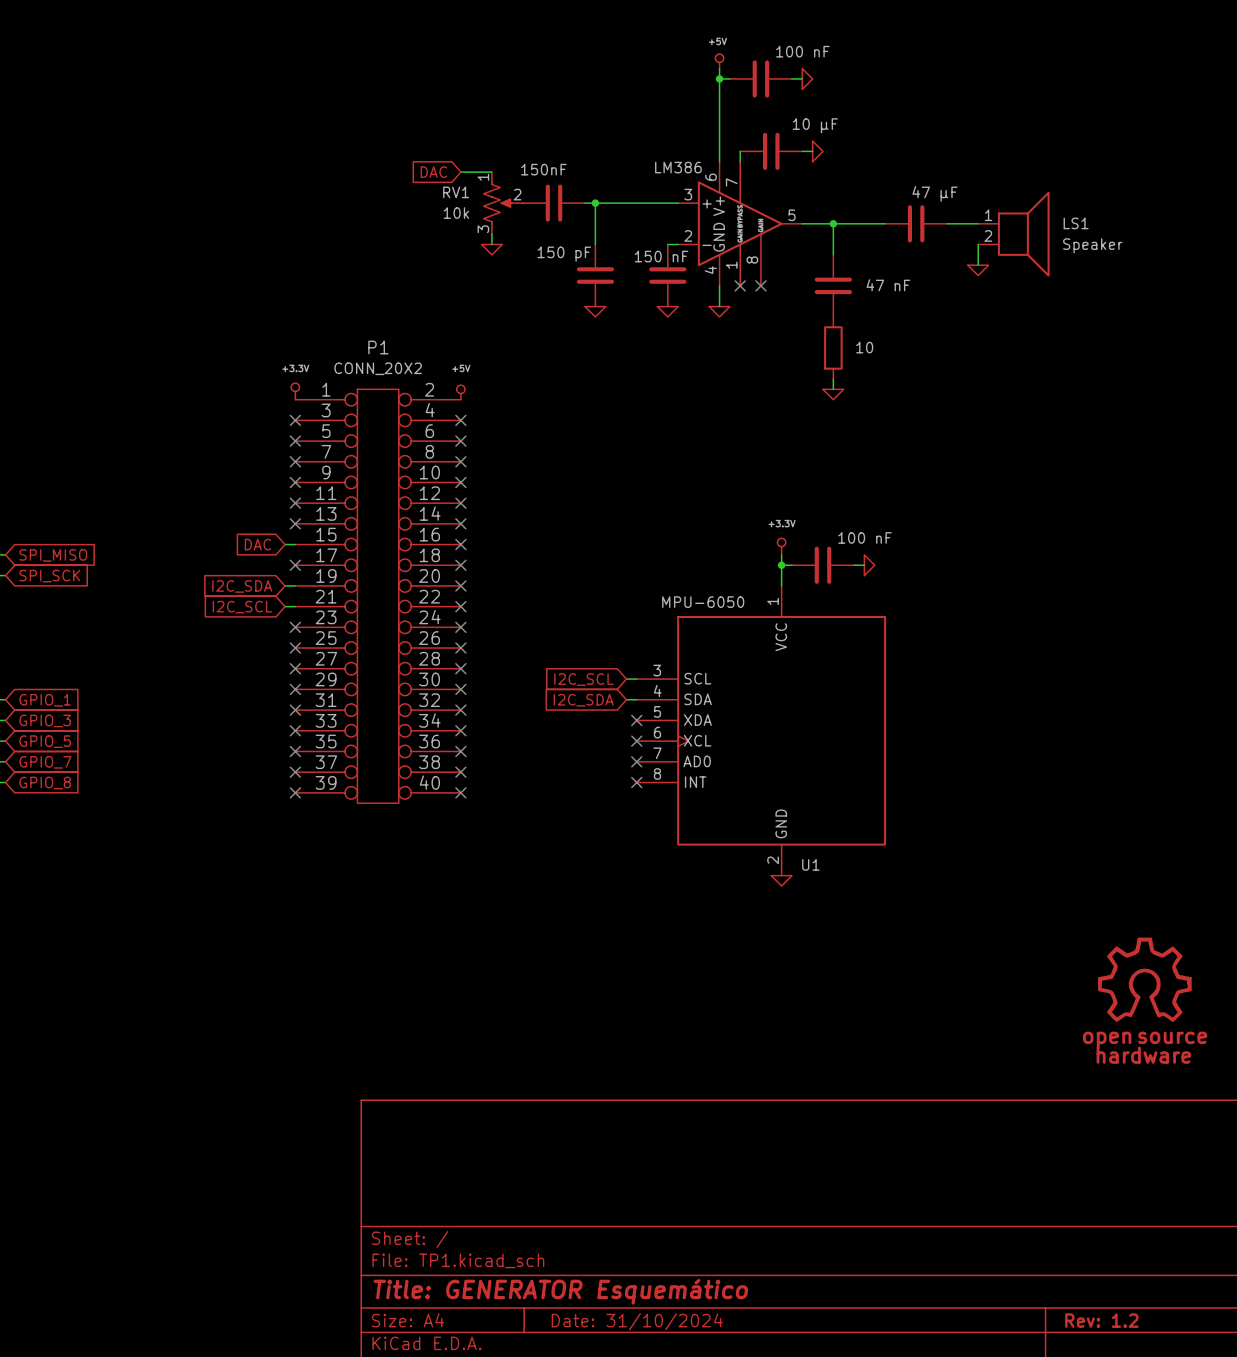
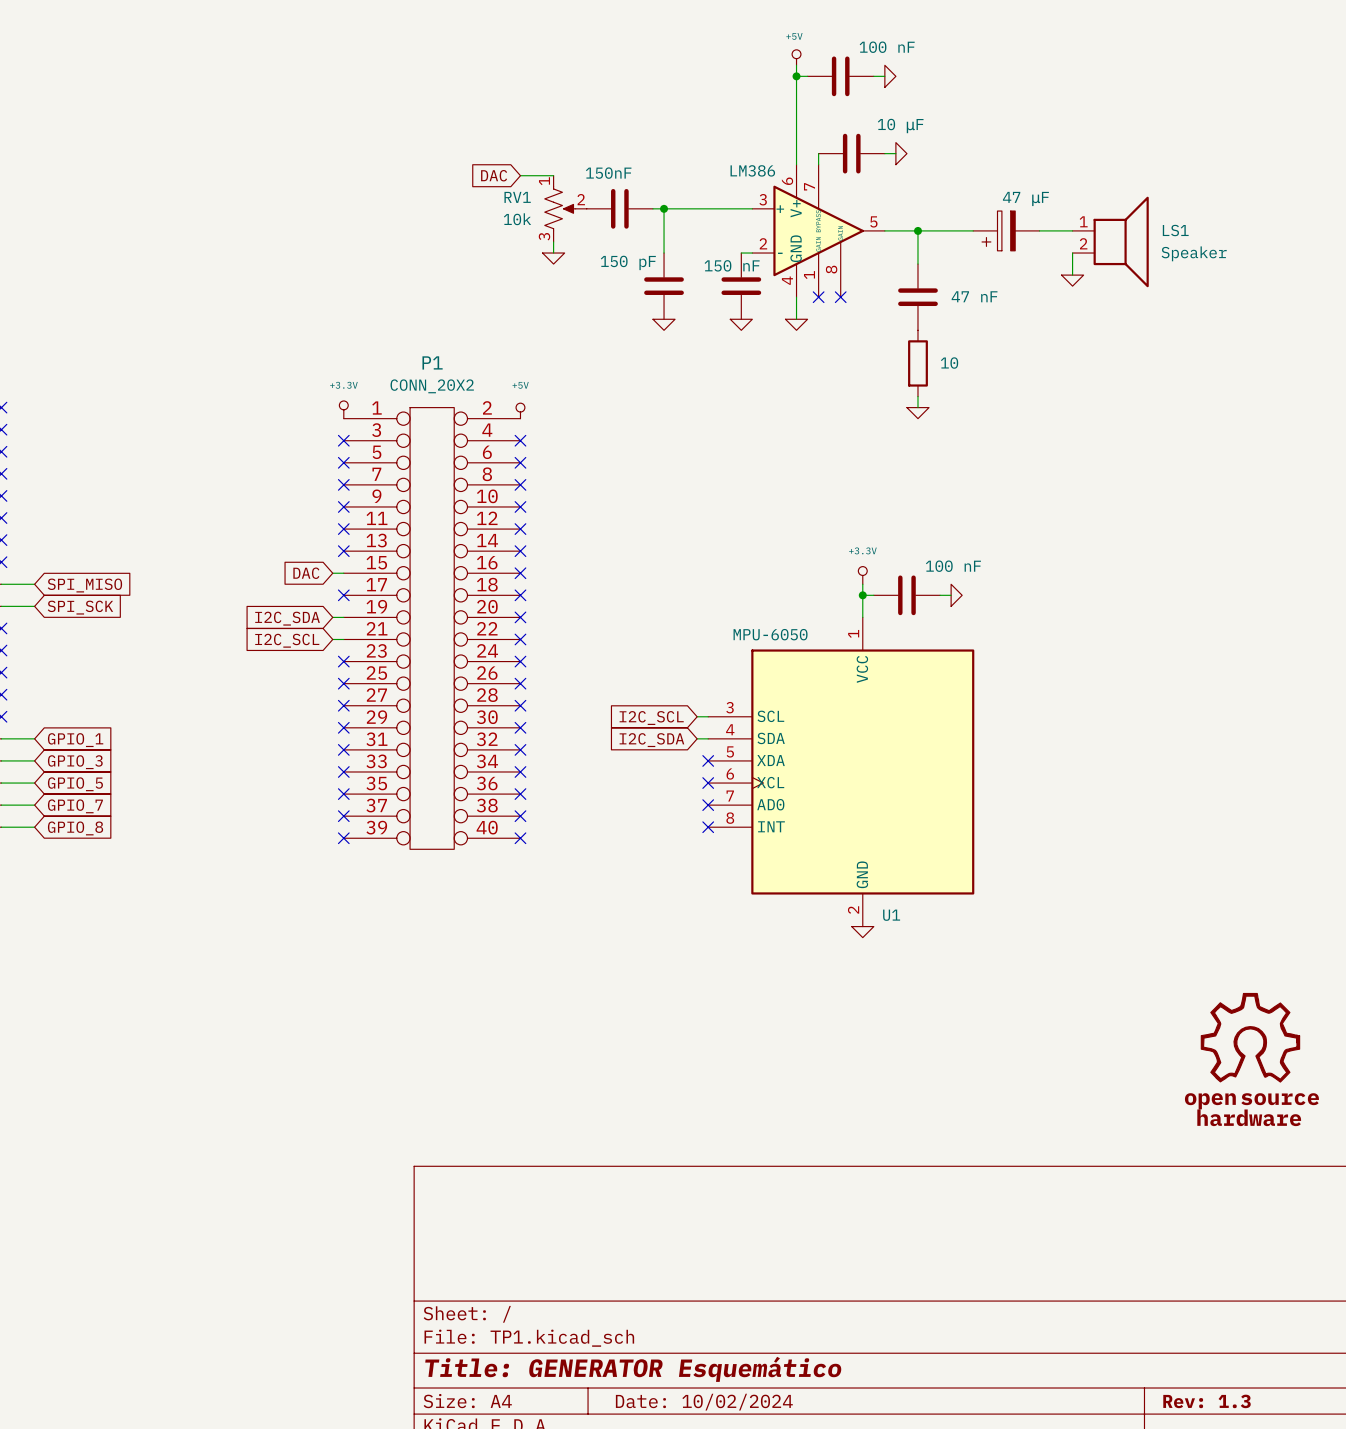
part symbol: [885, 205, 948, 243] -> [973, 211, 1040, 251]
title block: Rev: 1.2 (1101, 1320) -> Rev: 1.3 (1207, 1401)
title block: Date: 31/10/2024 (637, 1321) -> Date: 10/02/2024 (704, 1402)

